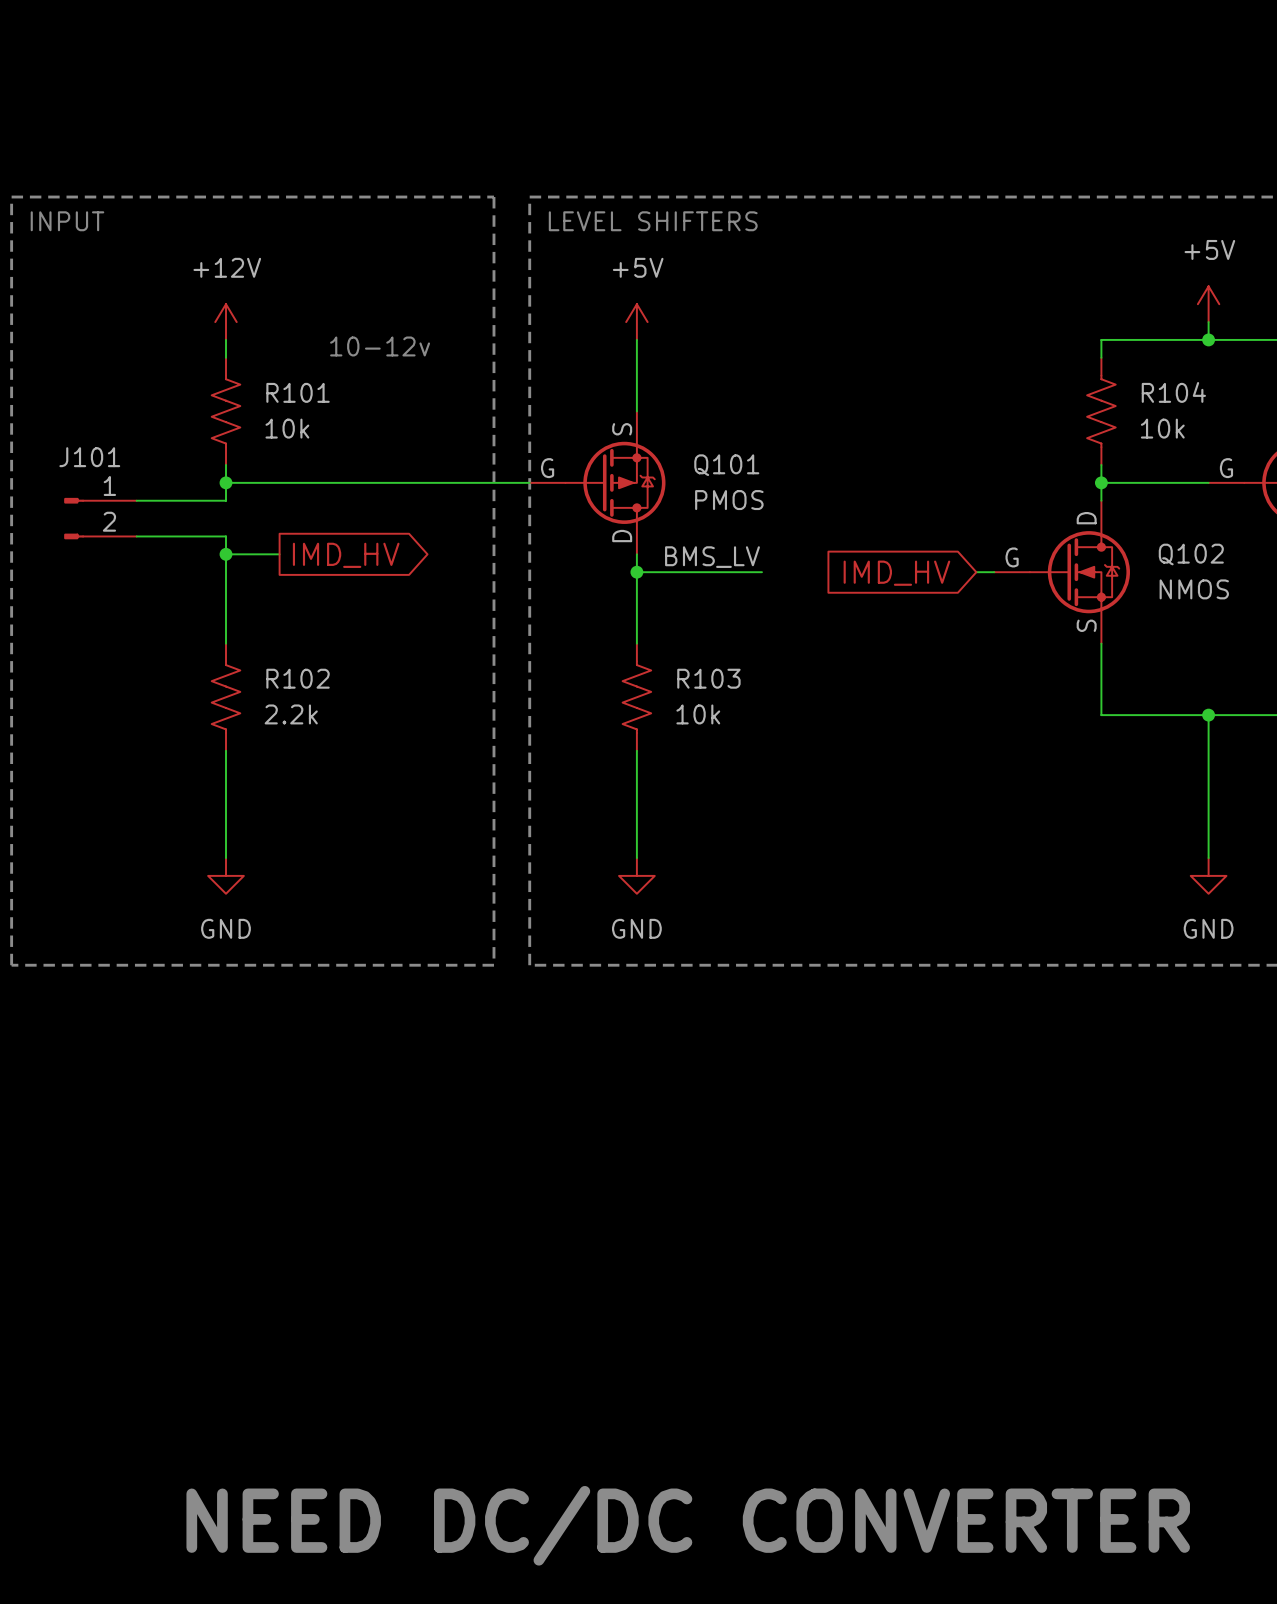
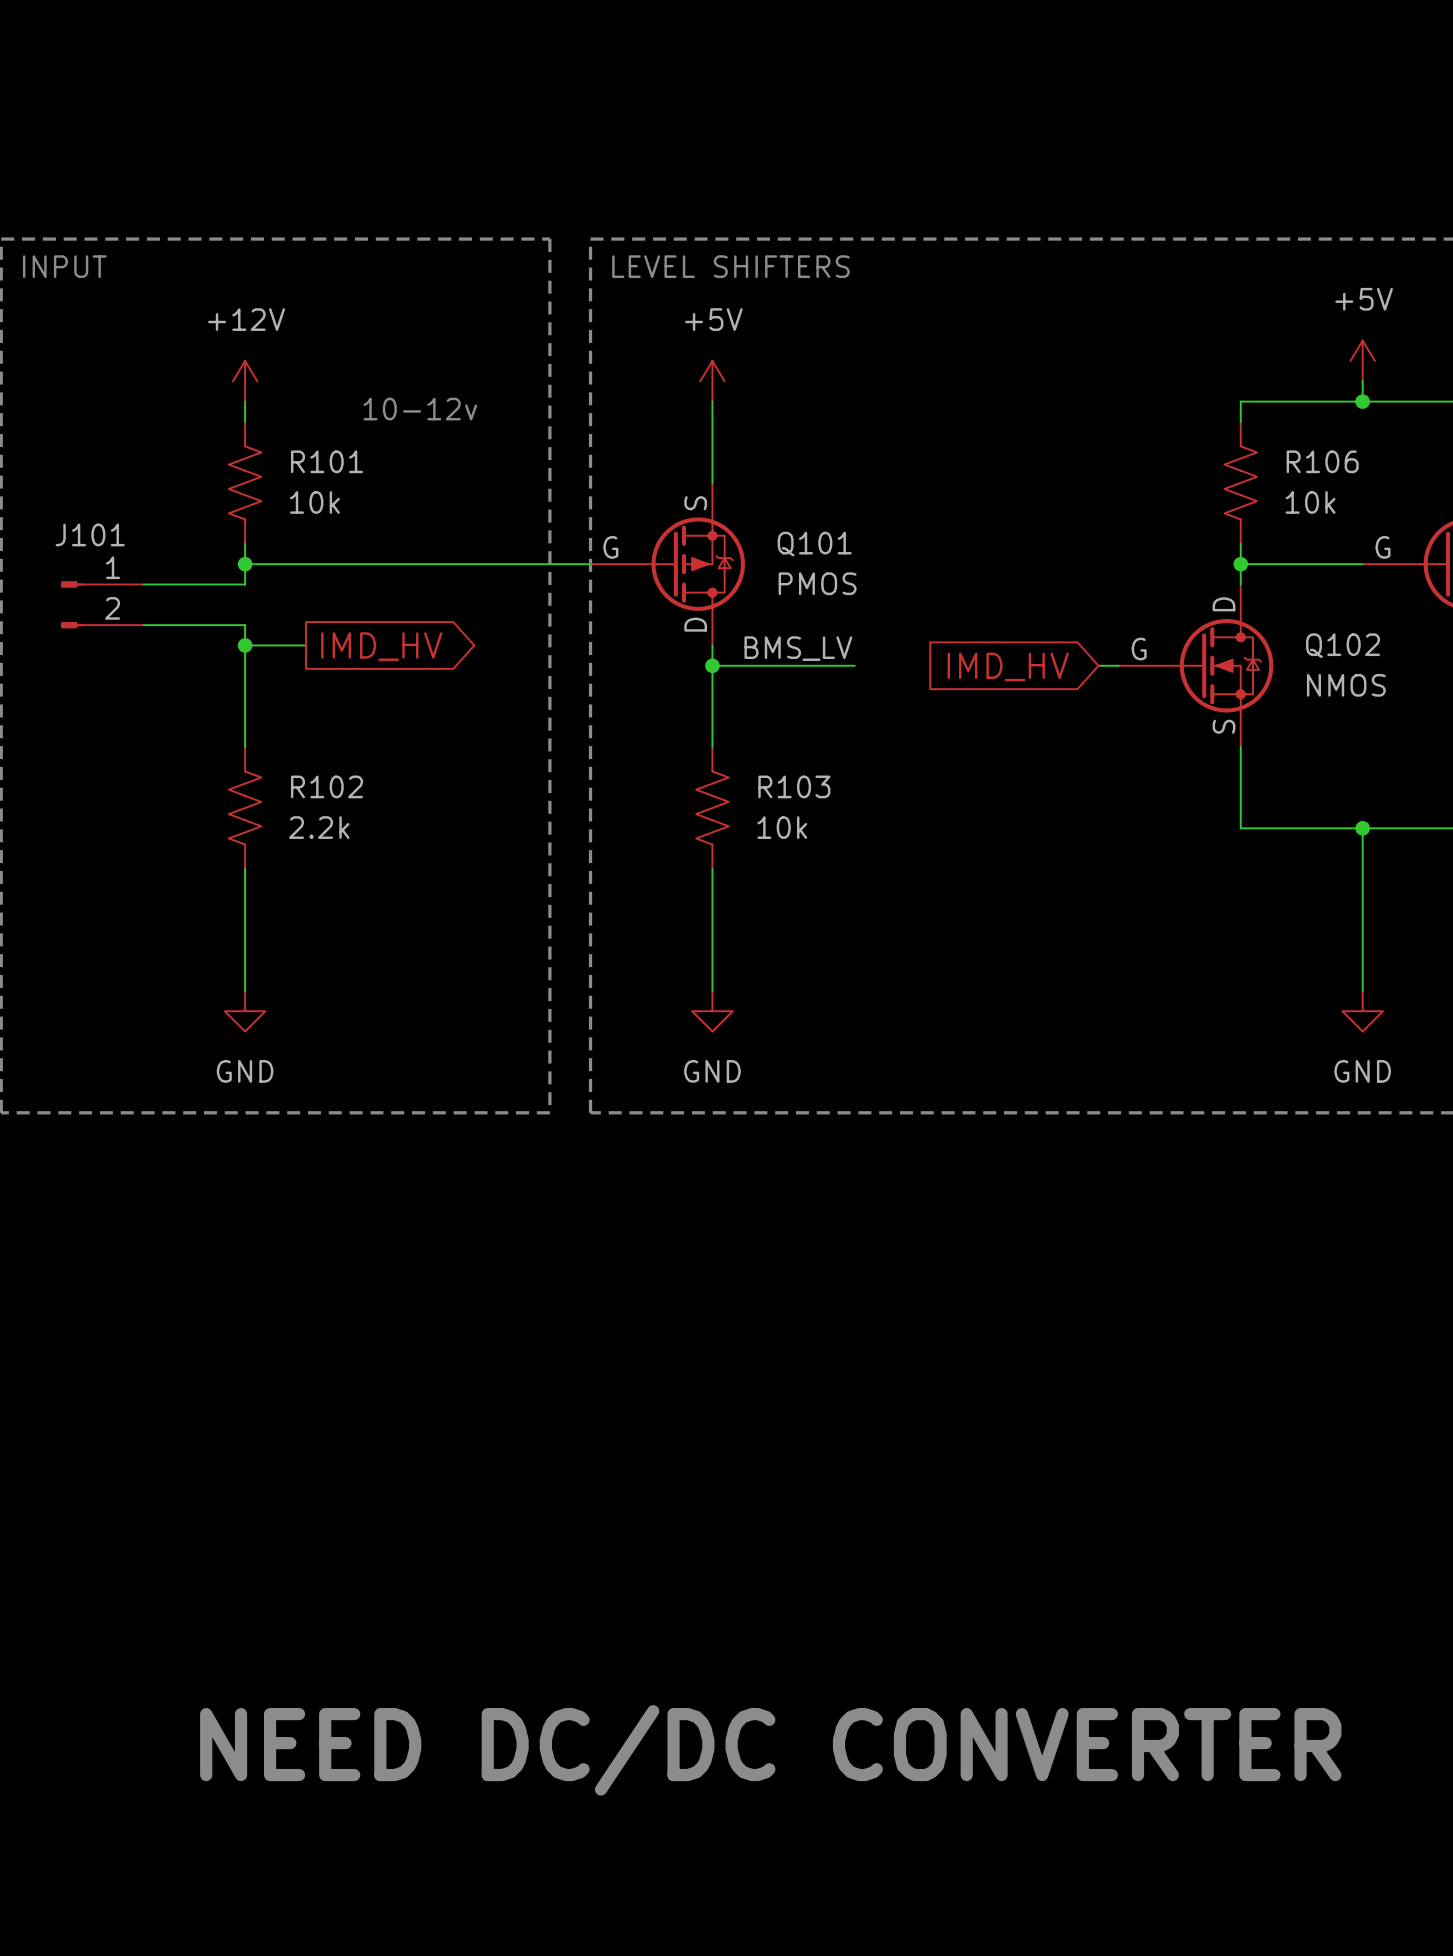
R104 name: R104 (1173, 392) -> R106 (1322, 461)

